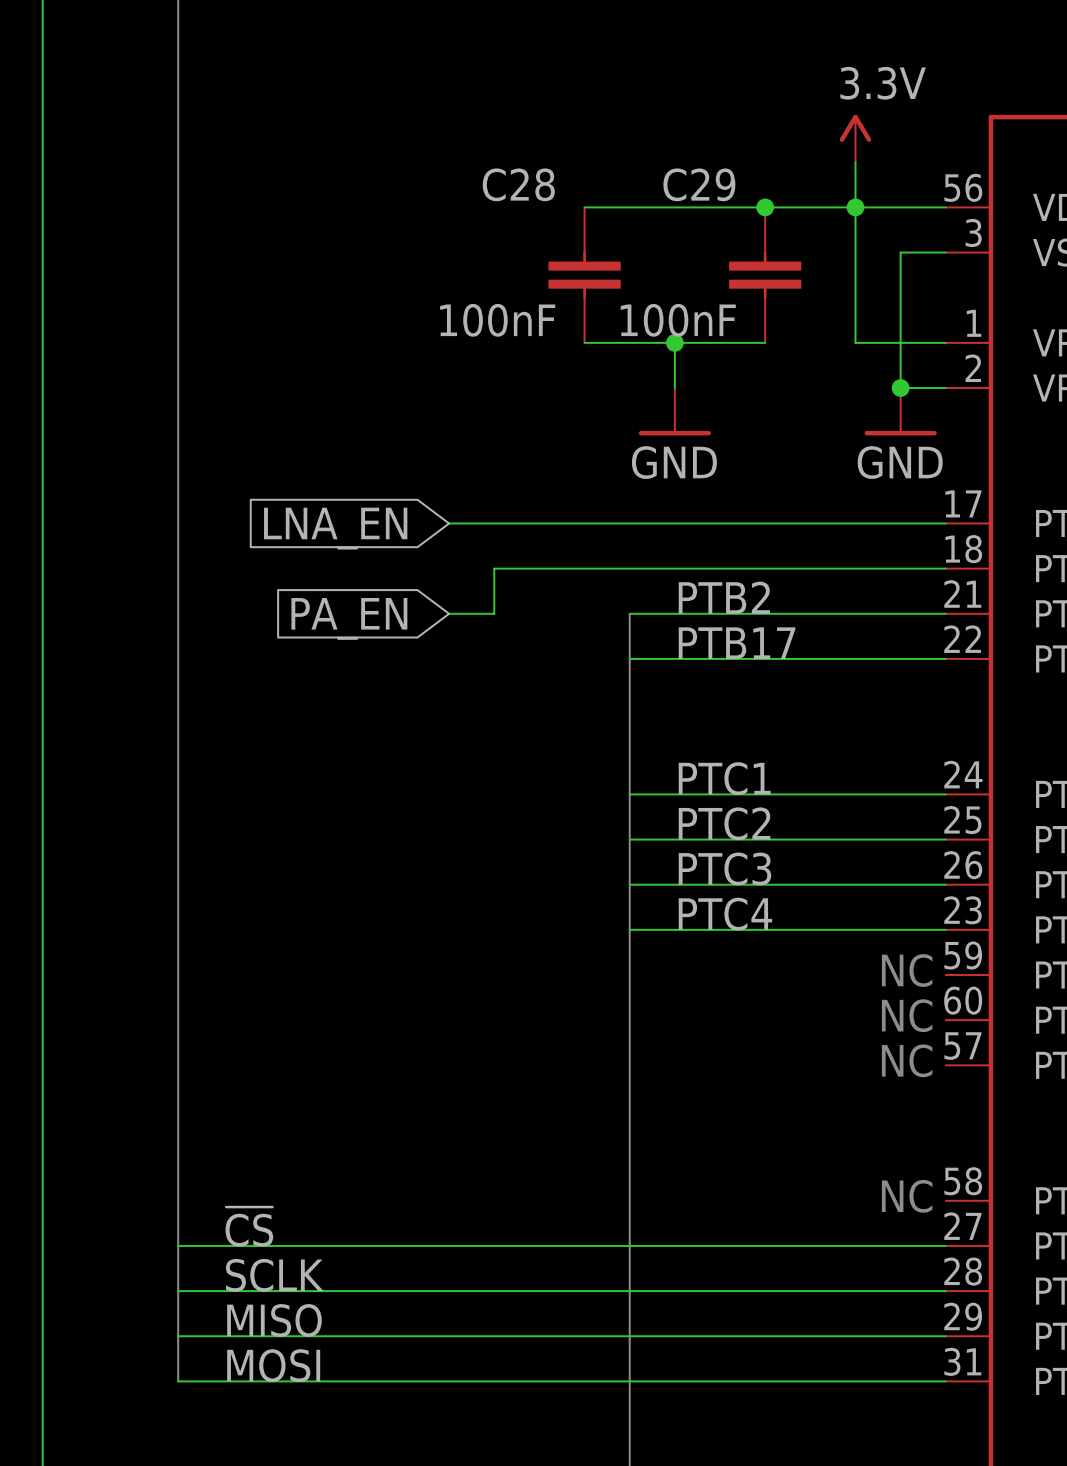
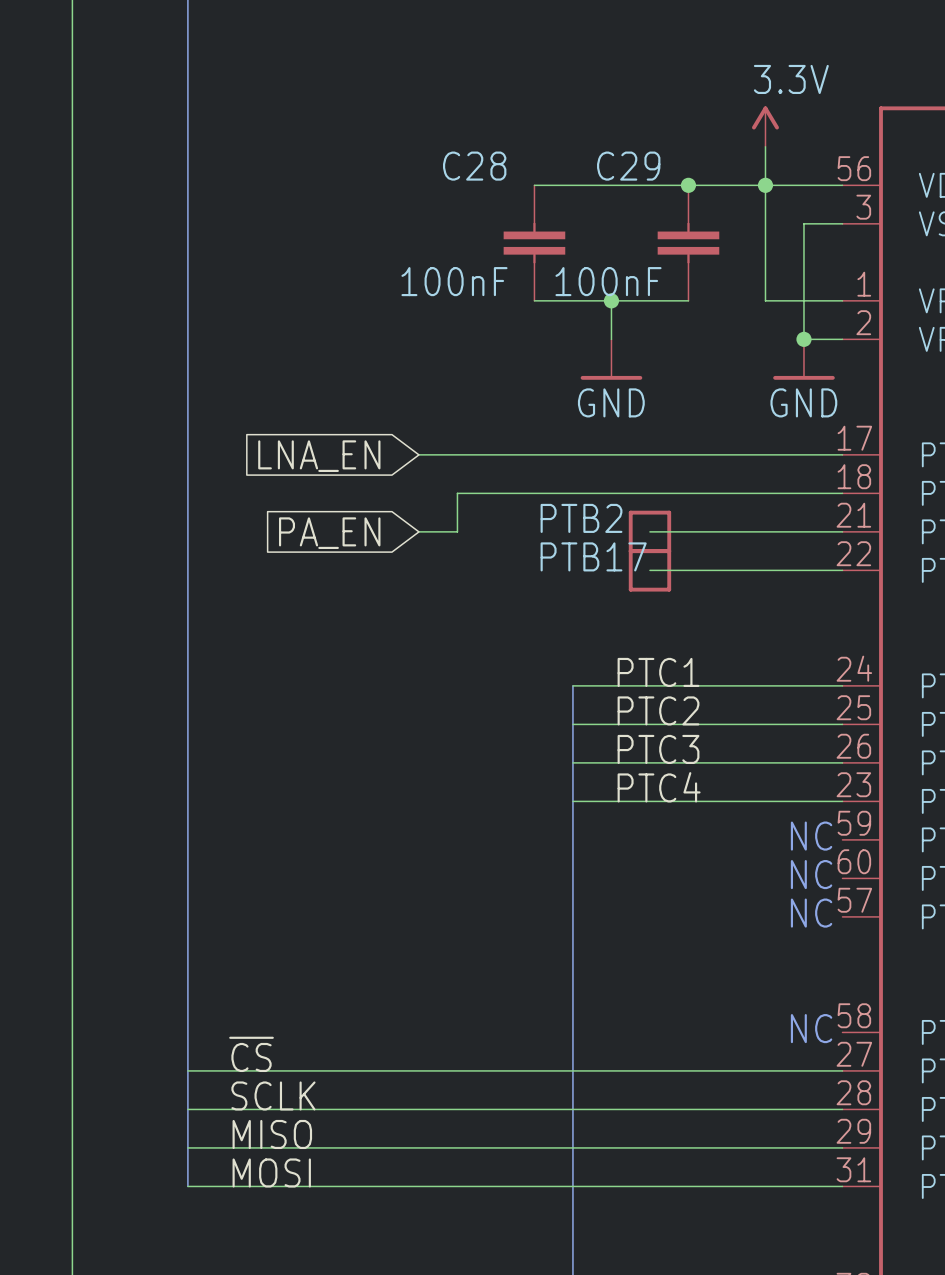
label: PTB2 (724, 597) -> none
bus: (629, 613) (629, 794) -> none
wire: (629, 613) (720, 613) -> none
PTB2: none -> (649, 531)
label: PTB17 (737, 643) -> none
wire: (629, 658) (720, 658) -> none
PTB17: none -> (649, 570)

